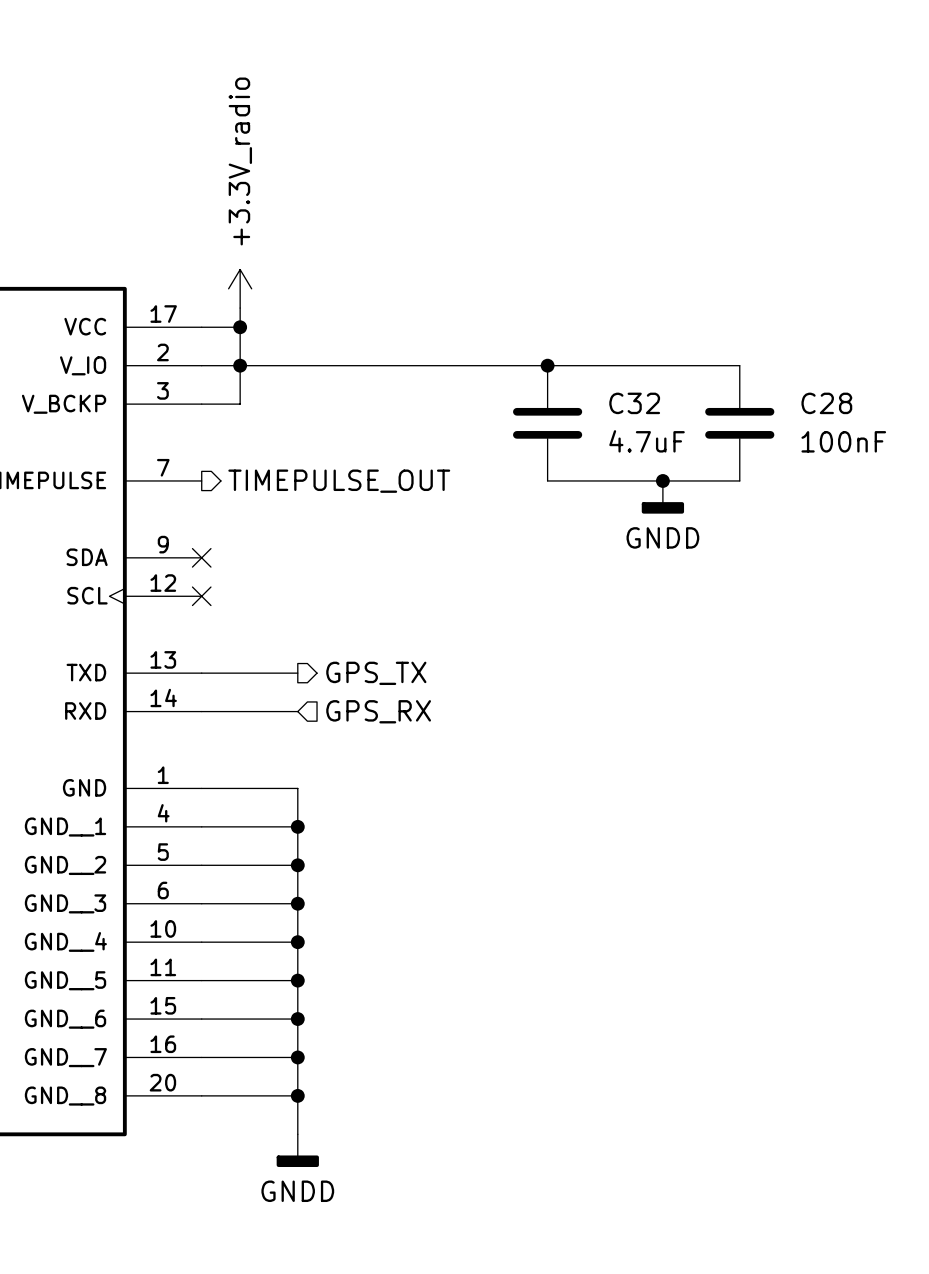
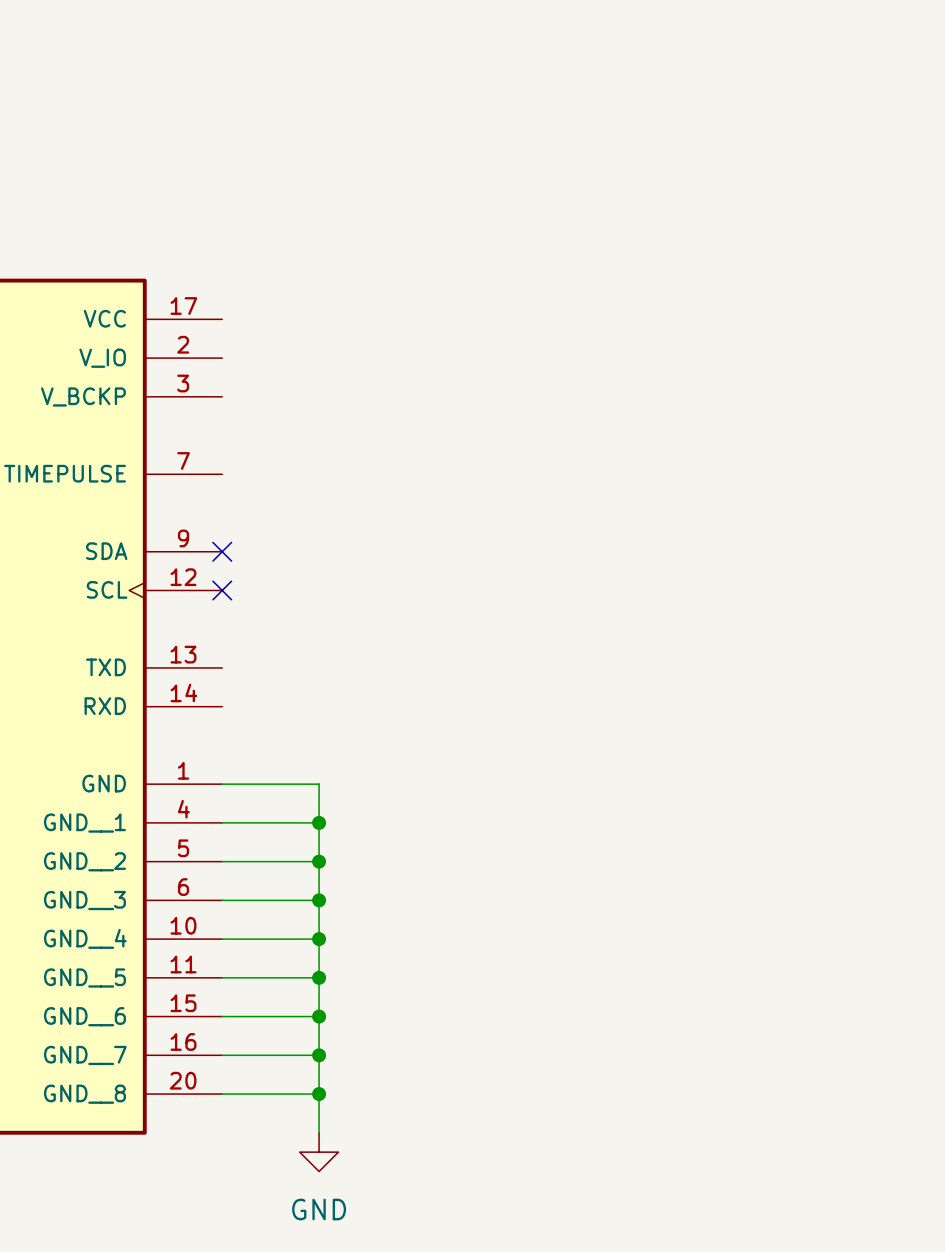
power symbol: +3.3V_radio (240, 288) -> none
wire: (240, 308) (240, 404) (201, 404) -> none
wire: (201, 327) (240, 327) -> none
junction: (240, 327) -> none
wire: (201, 365) (739, 365) -> none
junction: (240, 365) -> none
junction: (547, 365) -> none
C32: 4.7uF (547, 423) -> none
C28: 100nF (739, 423) -> none
wire: (547, 480) (739, 480) -> none
junction: (662, 480) -> none
hierarchical label: TIMEPULSE_OUT (339, 481) -> none
power symbol: GNDD (662, 497) -> none
wire: (201, 673) (297, 673) -> none
hierarchical label: GPS_TX (376, 673) -> none
wire: (201, 711) (297, 711) -> none
hierarchical label: GPS_RX (378, 711) -> none
power symbol: GNDD (297, 1150) -> GND (319, 1152)

